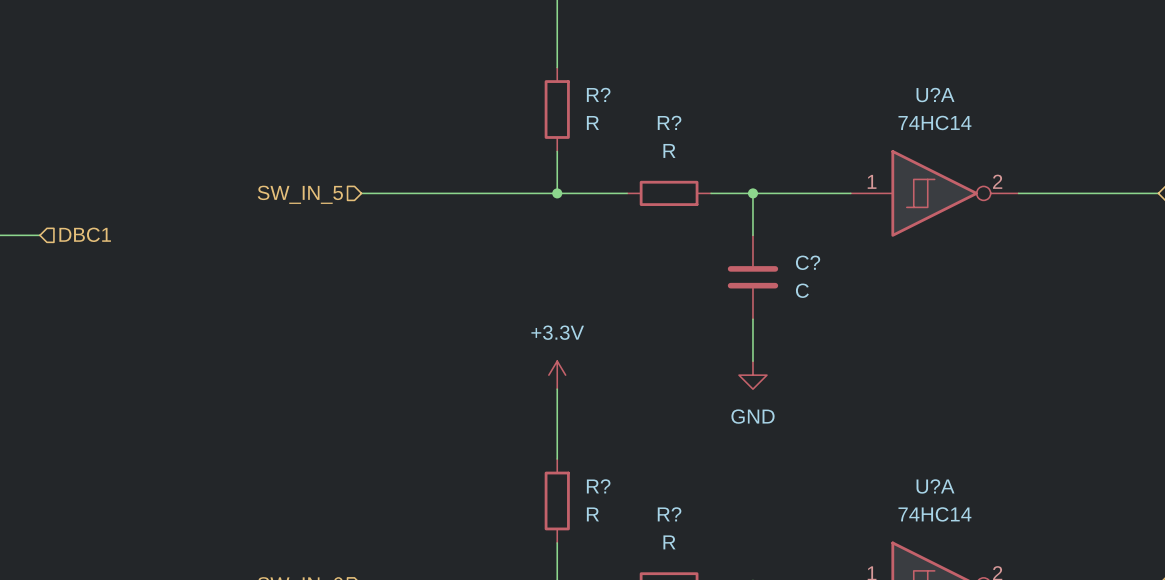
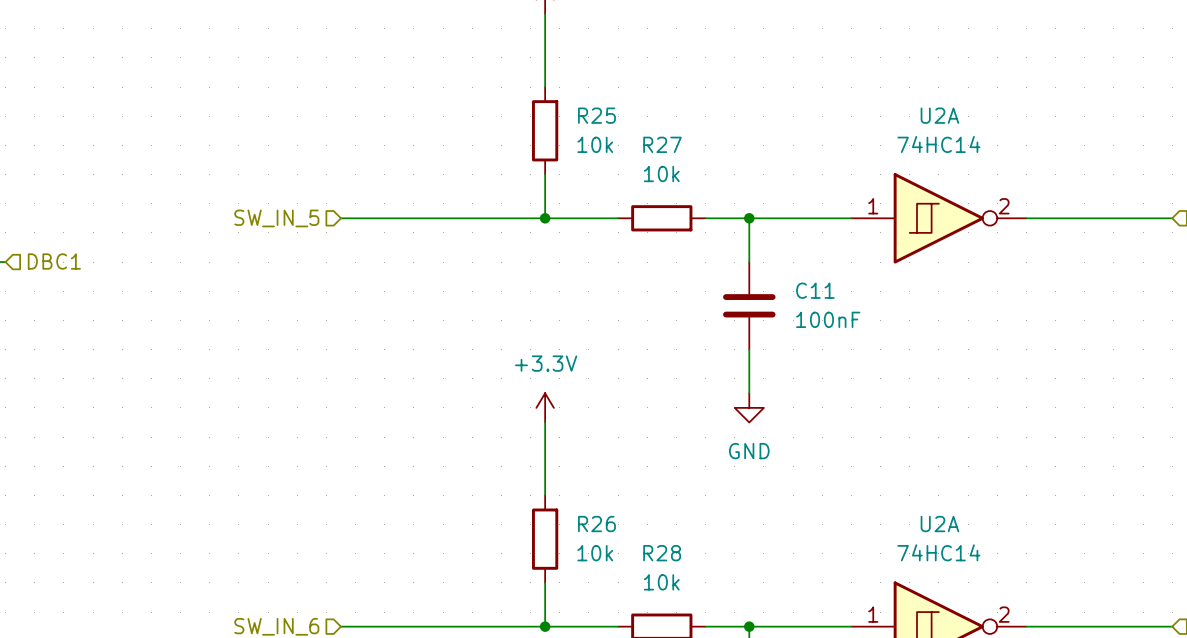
R? name: R? (598, 94) -> R25 (596, 115)
U?A name: U?A (935, 95) -> U2A (939, 115)
R? value: R (592, 122) -> 10k (595, 144)
R? name: R? (669, 122) -> R27 (662, 144)
R? value: R (669, 150) -> 10k (661, 174)
C? name: C? (808, 262) -> C11 (815, 290)
C? value: C (802, 290) -> 100nF (828, 319)
R? name: R? (598, 486) -> R26 (596, 524)
U?A name: U?A (935, 486) -> U2A (939, 524)
R? value: R (592, 514) -> 10k (595, 553)
R? name: R? (669, 514) -> R28 (662, 553)
R? value: R (669, 542) -> 10k (661, 582)

